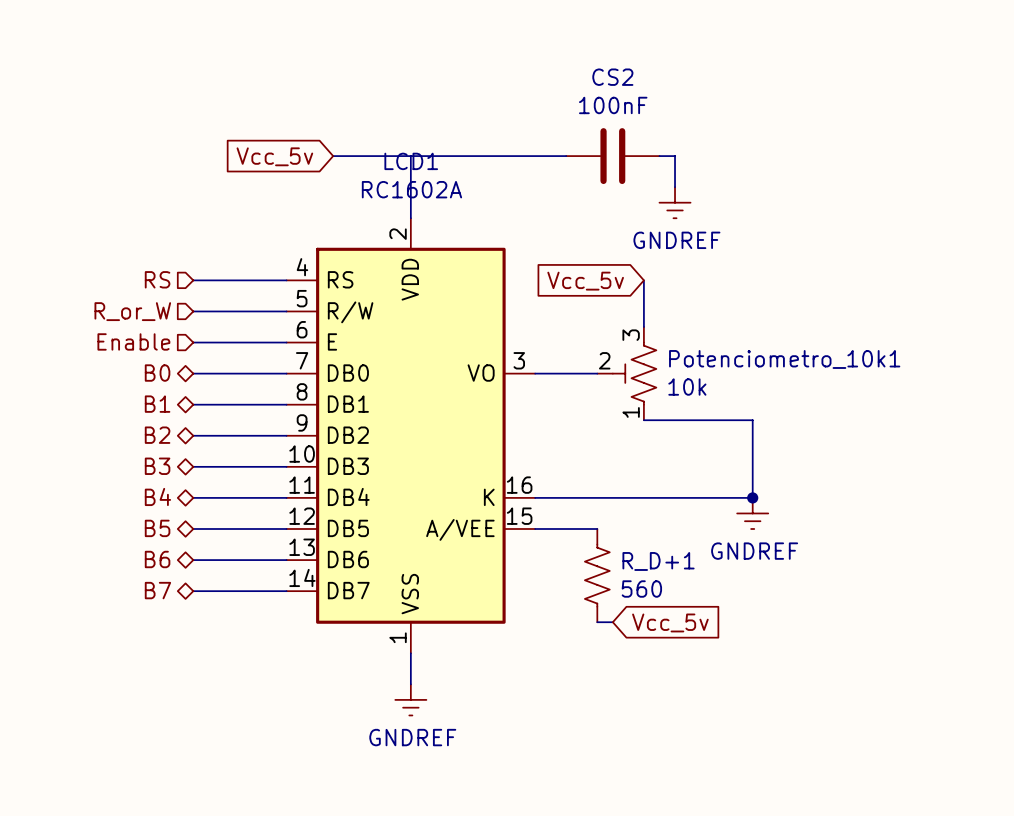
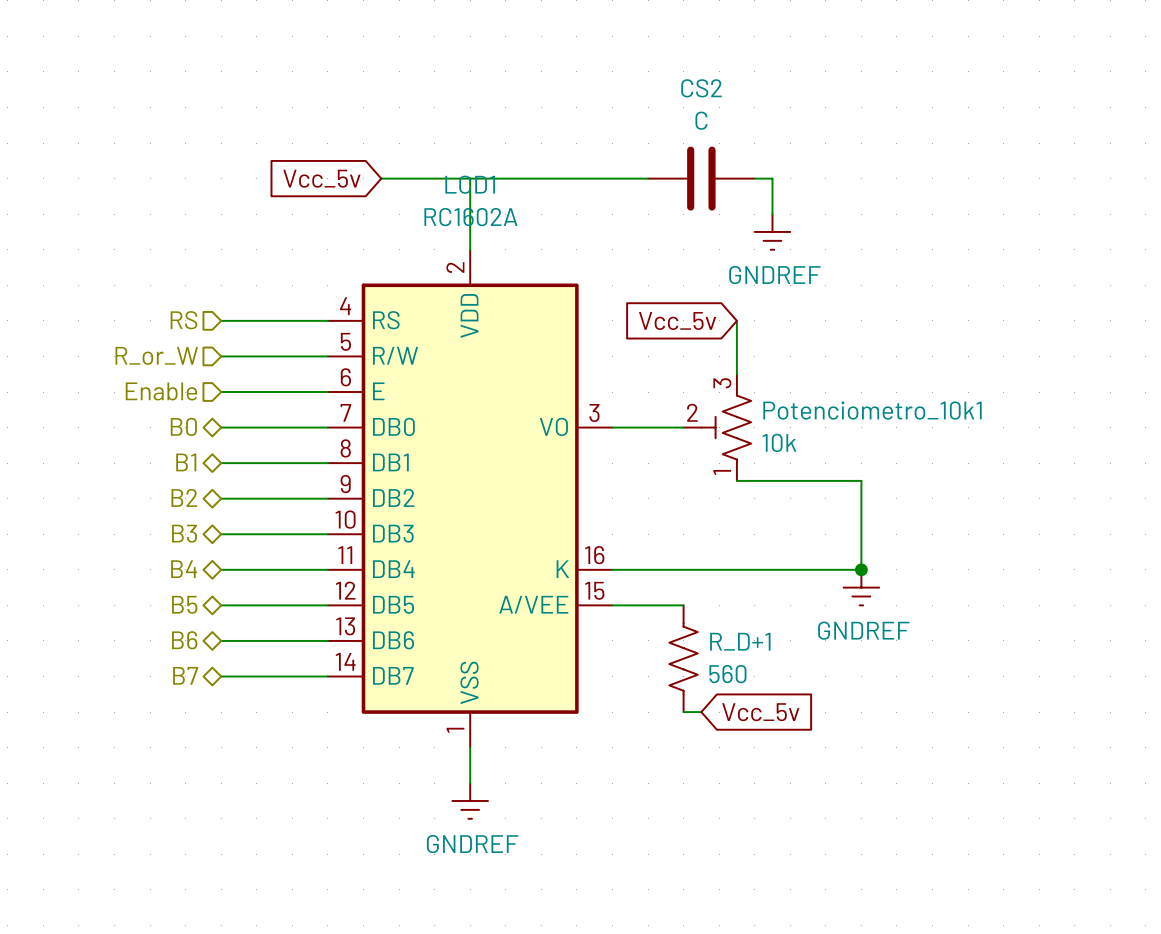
CS2 value: 100nF (613, 105) -> C (701, 120)

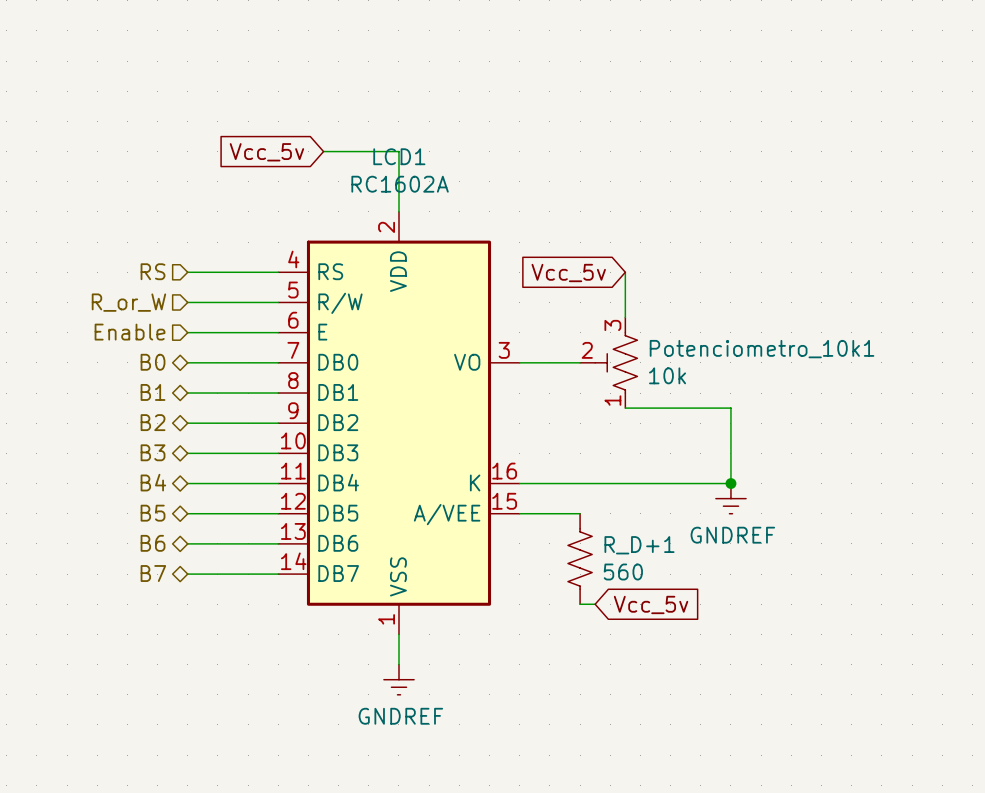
wire: (470, 178) (648, 178) -> none
CS2: C (701, 178) -> none
wire: (754, 178) (772, 178) (772, 214) -> none
power symbol: GNDREF (772, 231) -> none

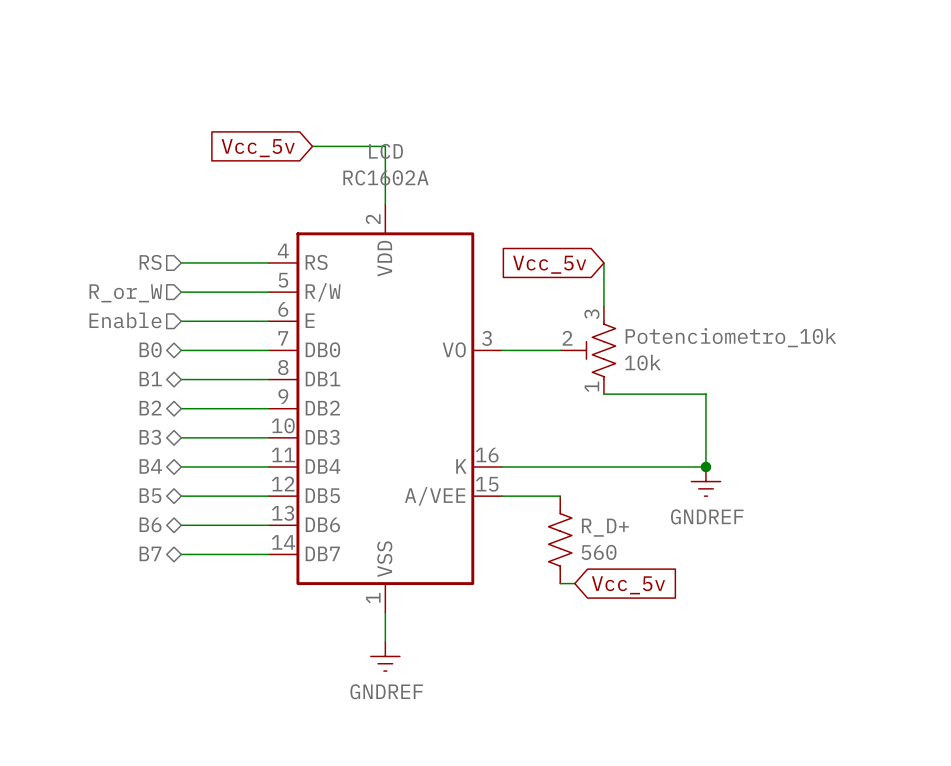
LCD1 name: LCD1 (399, 156) -> LCD (386, 151)
Potenciometro_10k1 name: Potenciometro_10k1 (762, 349) -> Potenciometro_10k (730, 337)
R_D+1 name: R_D+1 (639, 545) -> R_D+ (605, 527)

